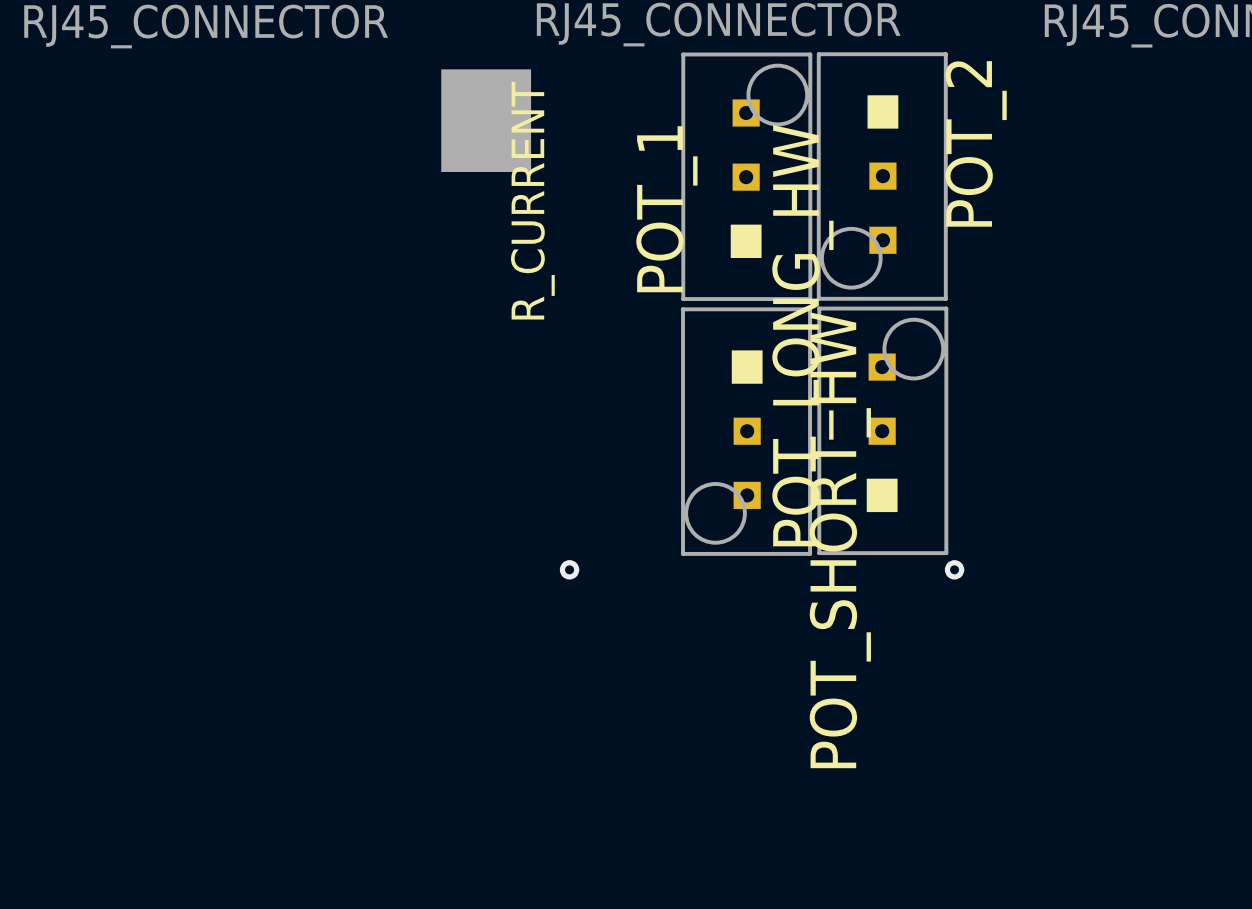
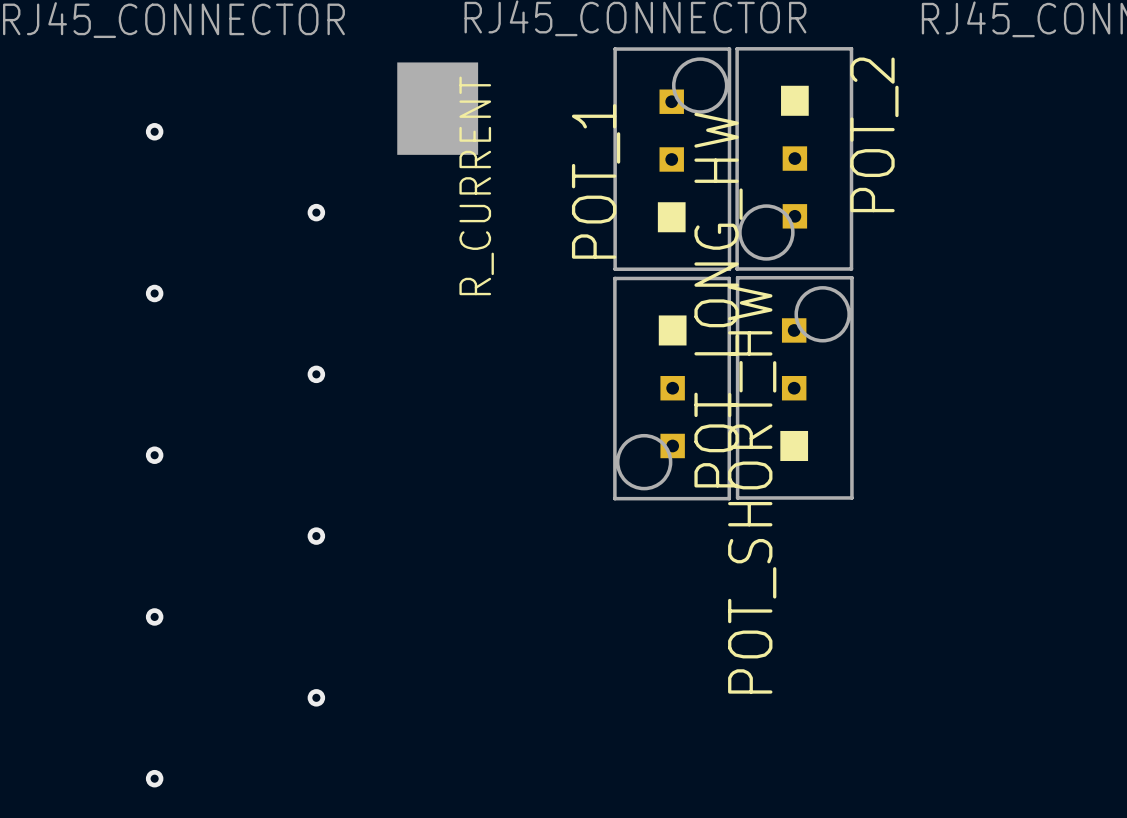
via: none -> (154, 131)
via: none -> (316, 212)
via: none -> (154, 293)
via: none -> (316, 374)
via: none -> (154, 455)
via: (569, 569) -> none
via: (954, 569) -> none
via: none -> (316, 536)
via: none -> (154, 616)
via: none -> (316, 697)
via: none -> (154, 778)

